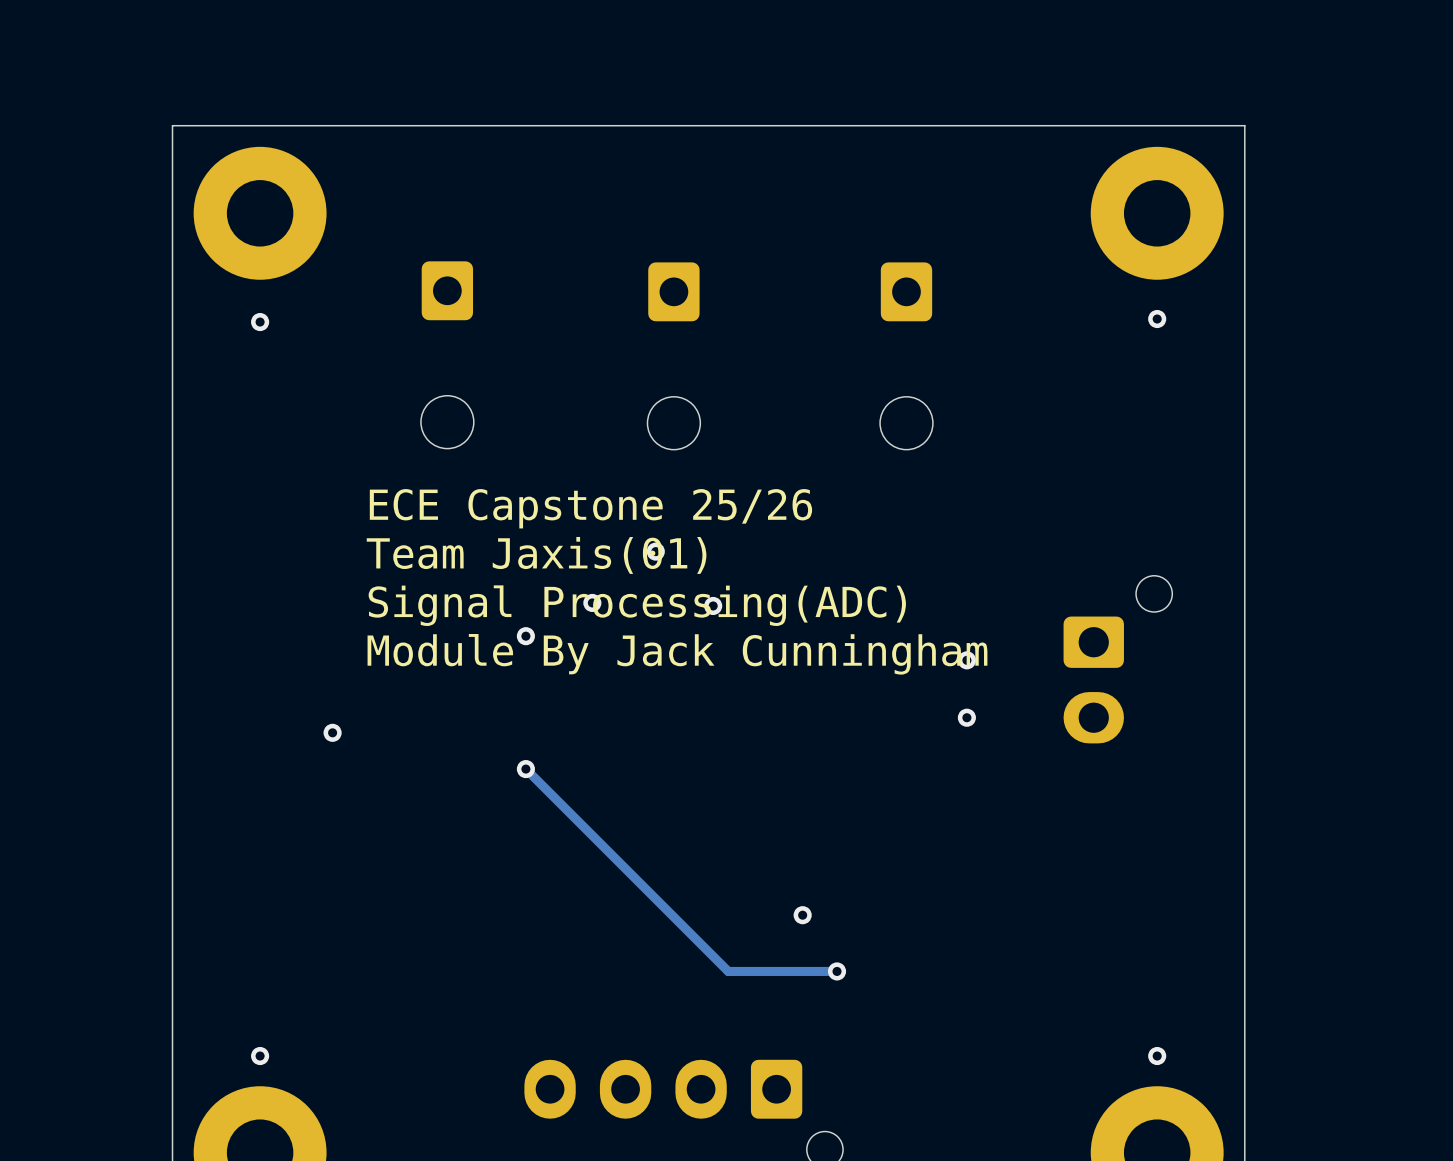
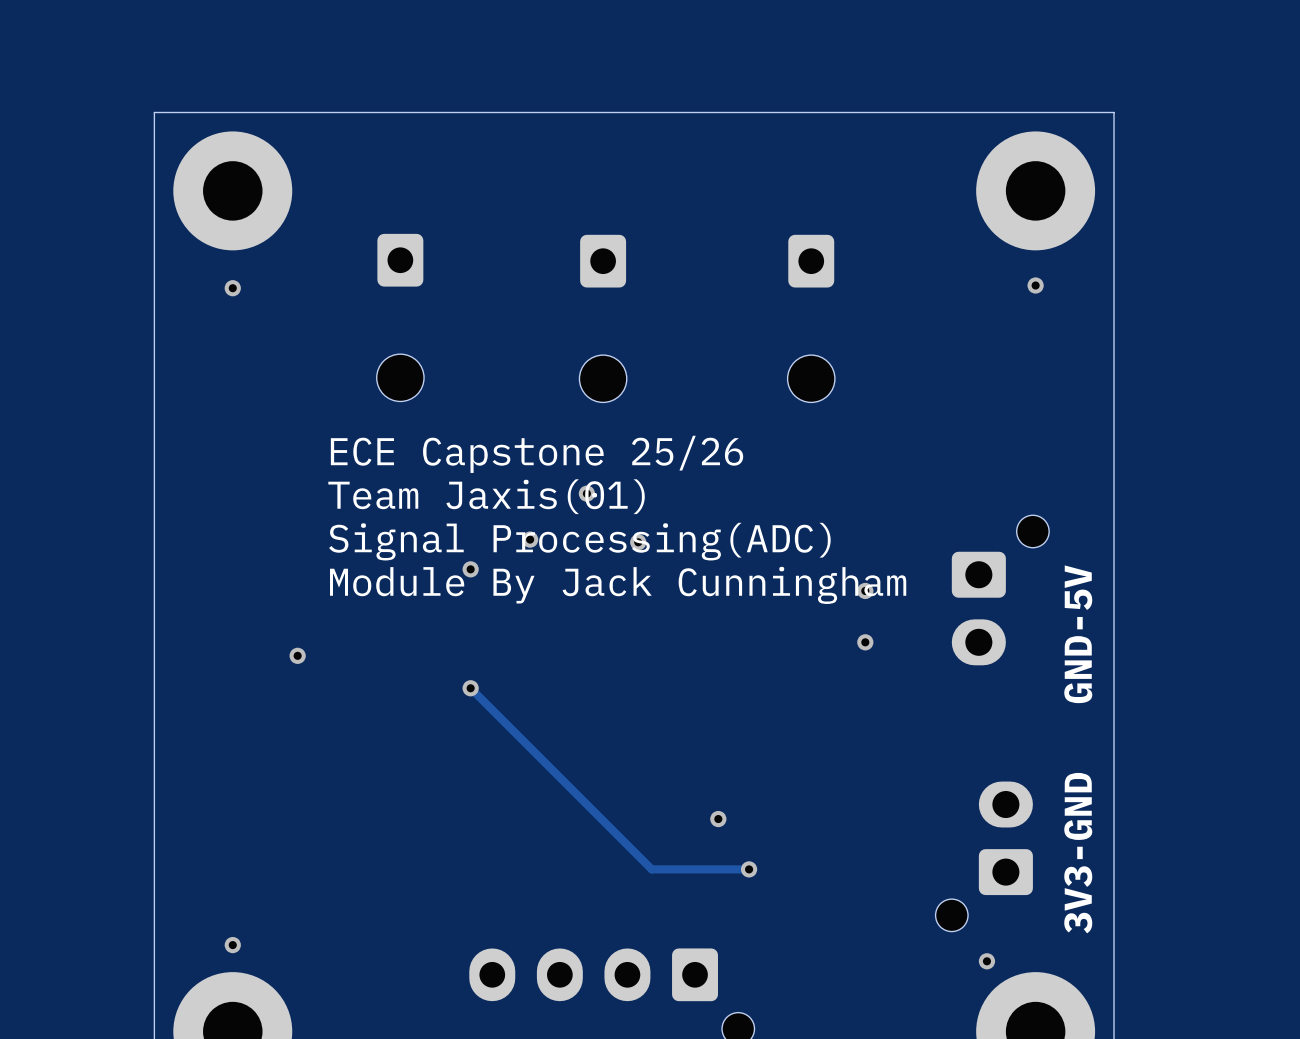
text: none -> GND-5V (1078, 634)
text: none -> 3V3-GND (1078, 853)
part: none -> (984, 856)
via position: (1157, 1056) -> (986, 961)

